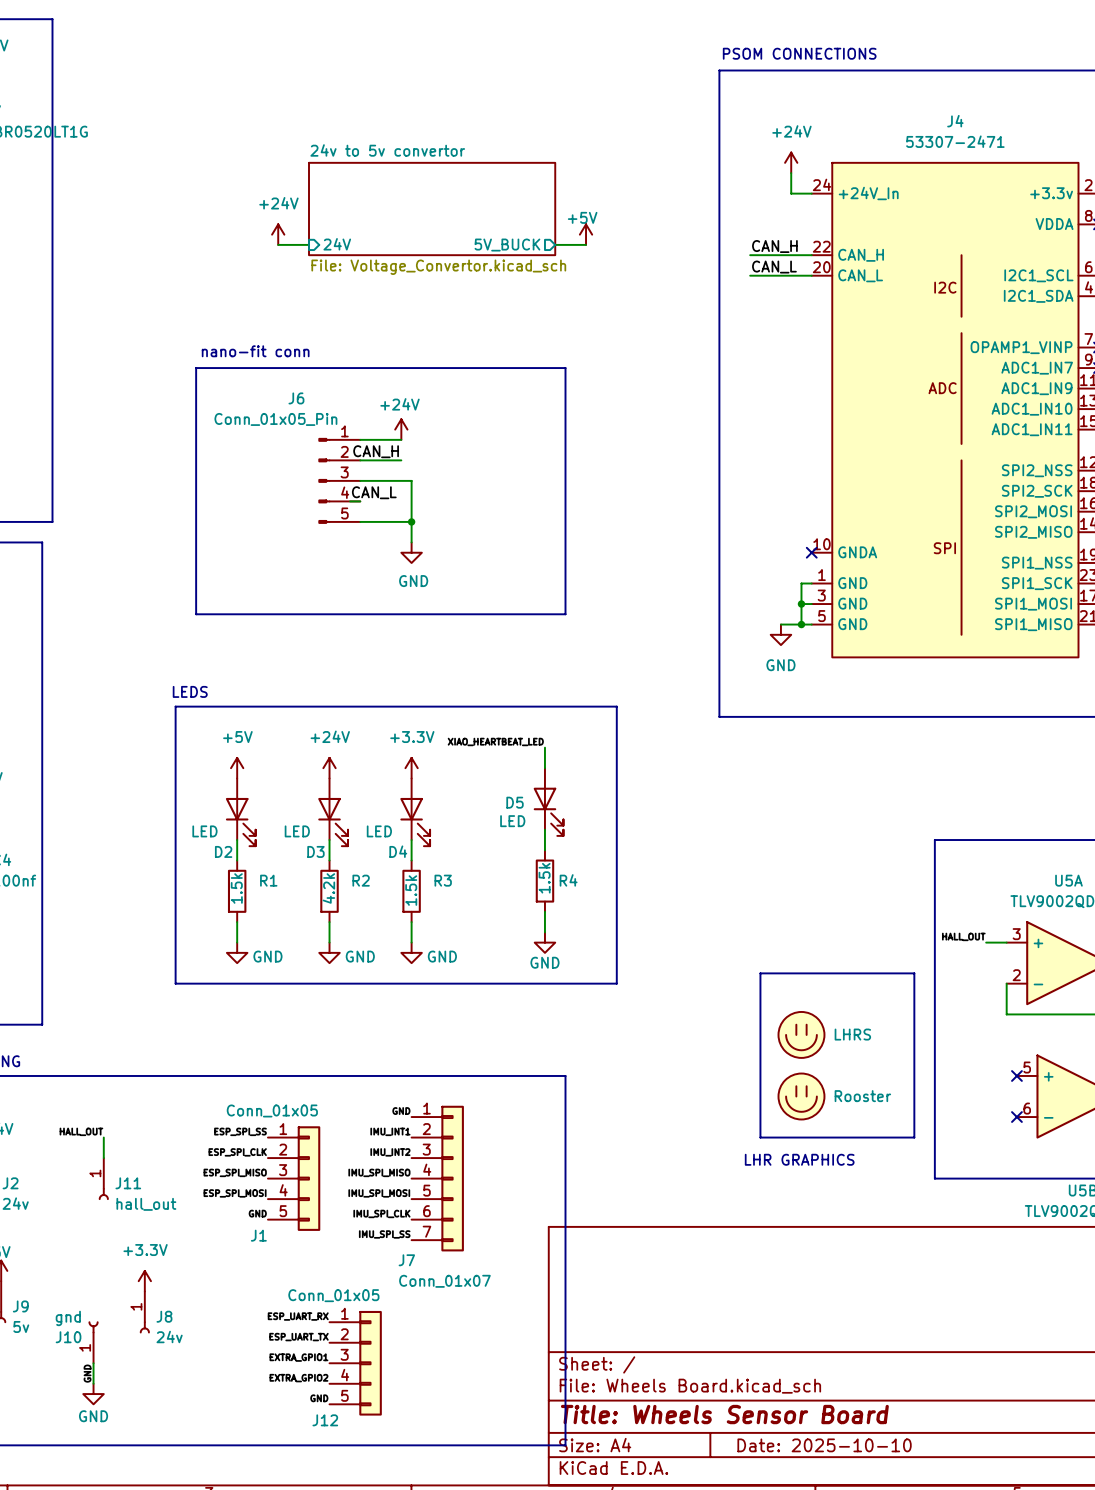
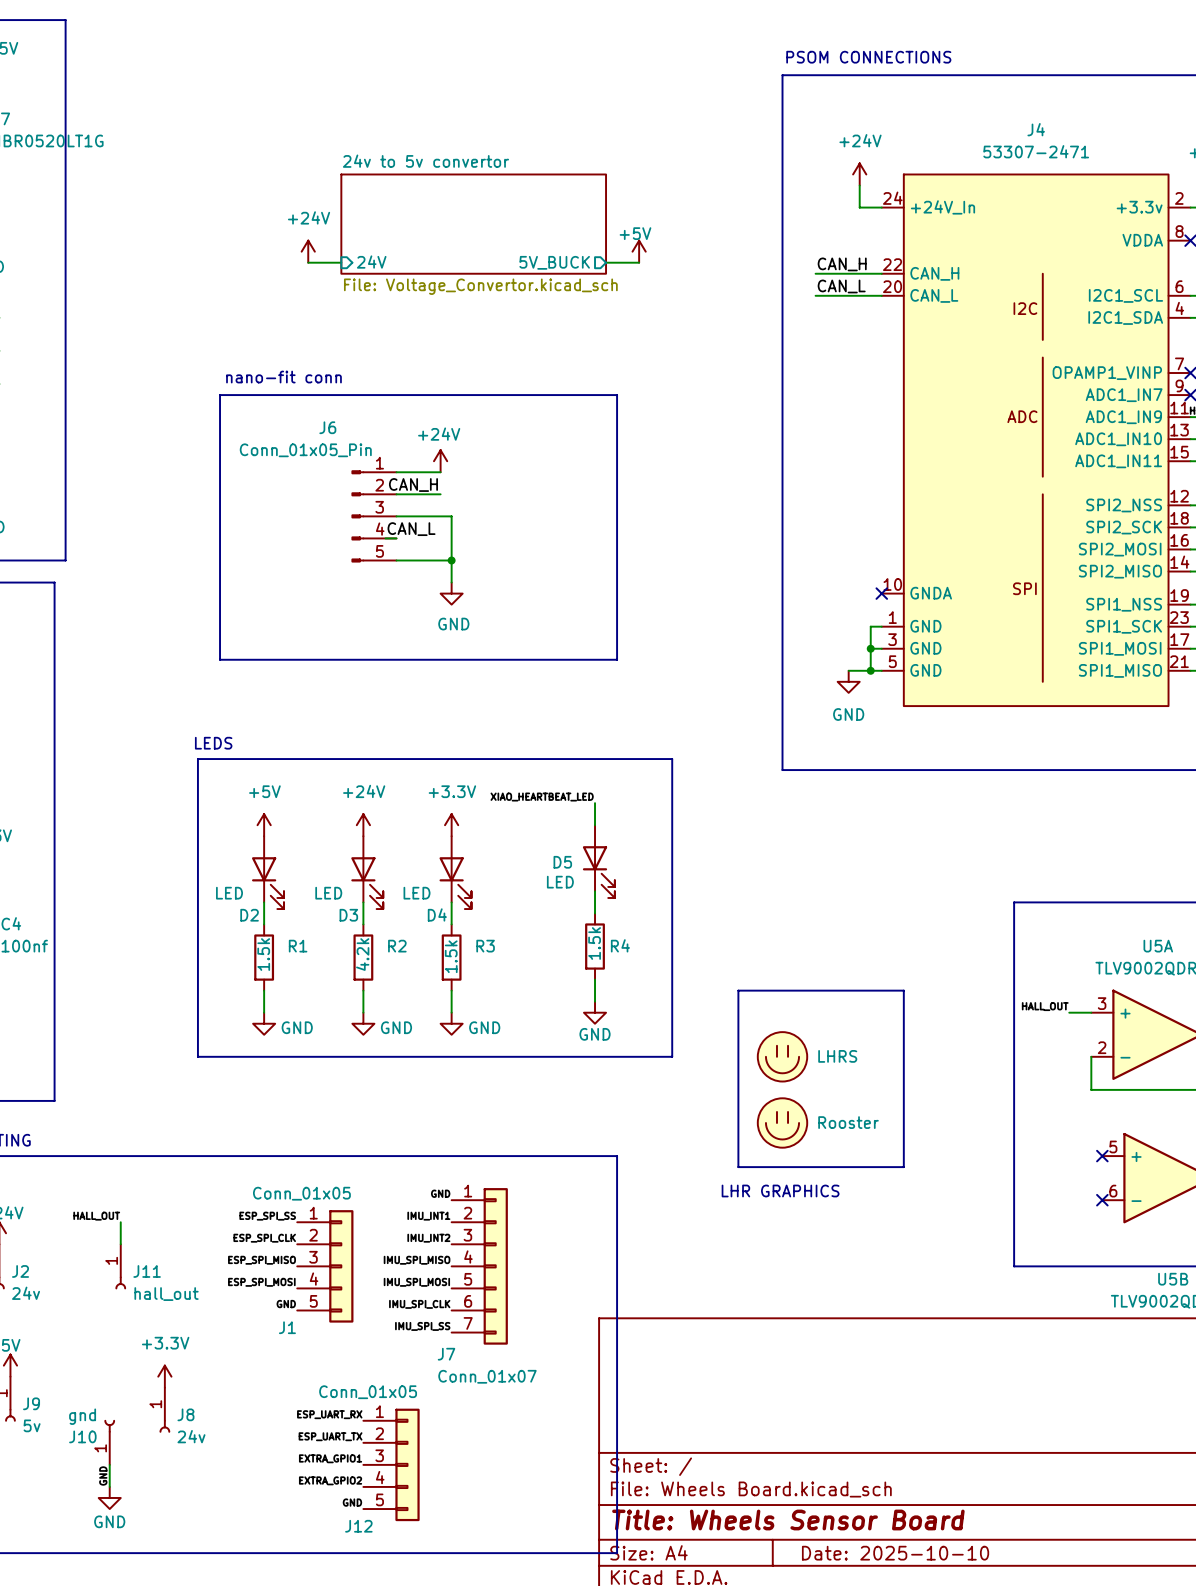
line: (760, 973) (914, 973) (914, 1137) (760, 1137) (760, 973) -> (738, 990) (903, 990) (903, 1167) (738, 1167) (738, 990)
part position: (801, 1034) -> (782, 1056)
part position: (801, 1096) -> (782, 1122)
text position: LHR GRAPHICS (799, 1159) -> LHR GRAPHICS (780, 1190)

